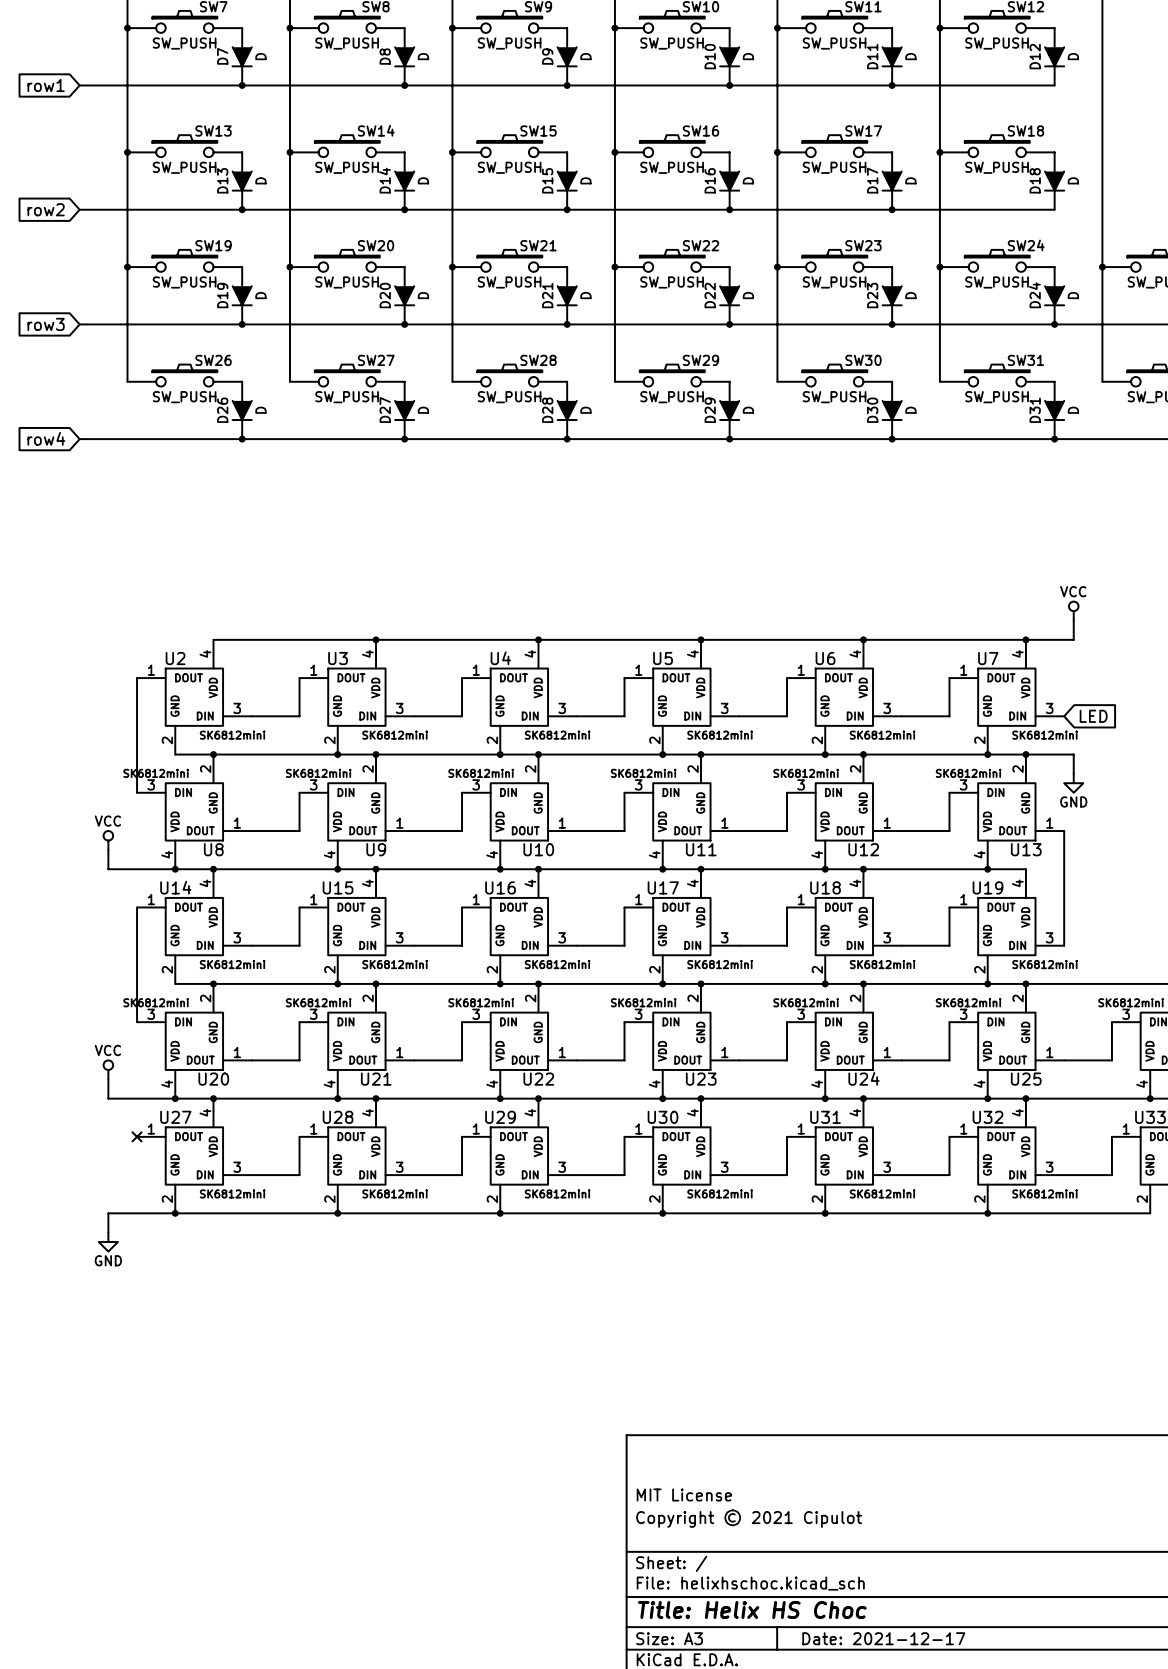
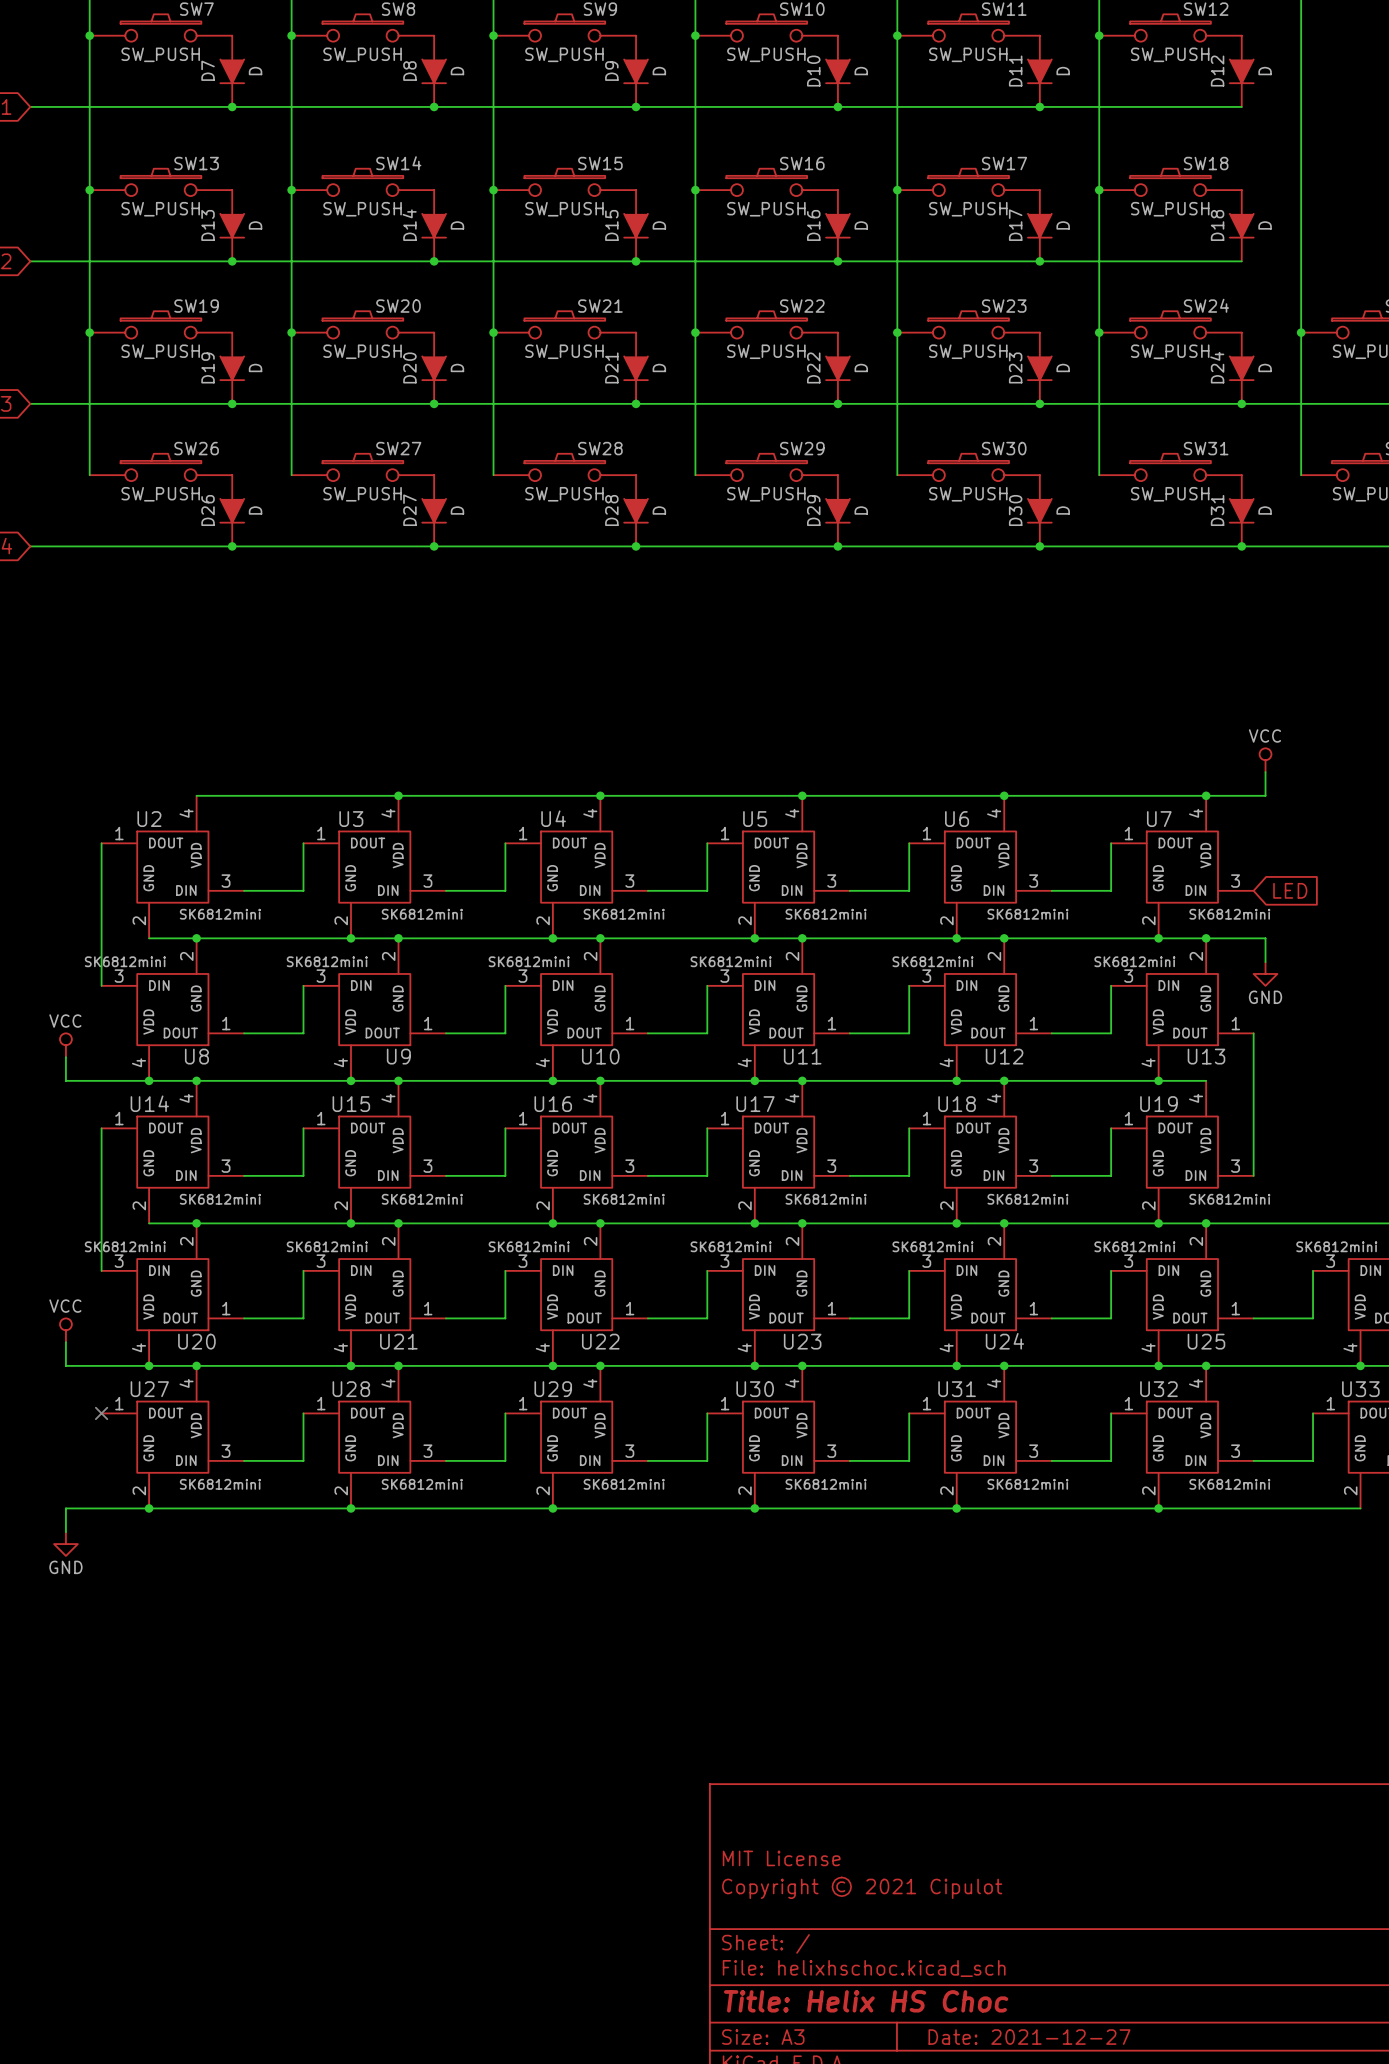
title block: Date: 2021-12-17 (883, 1638) -> Date: 2021-12-27 (1029, 2037)

